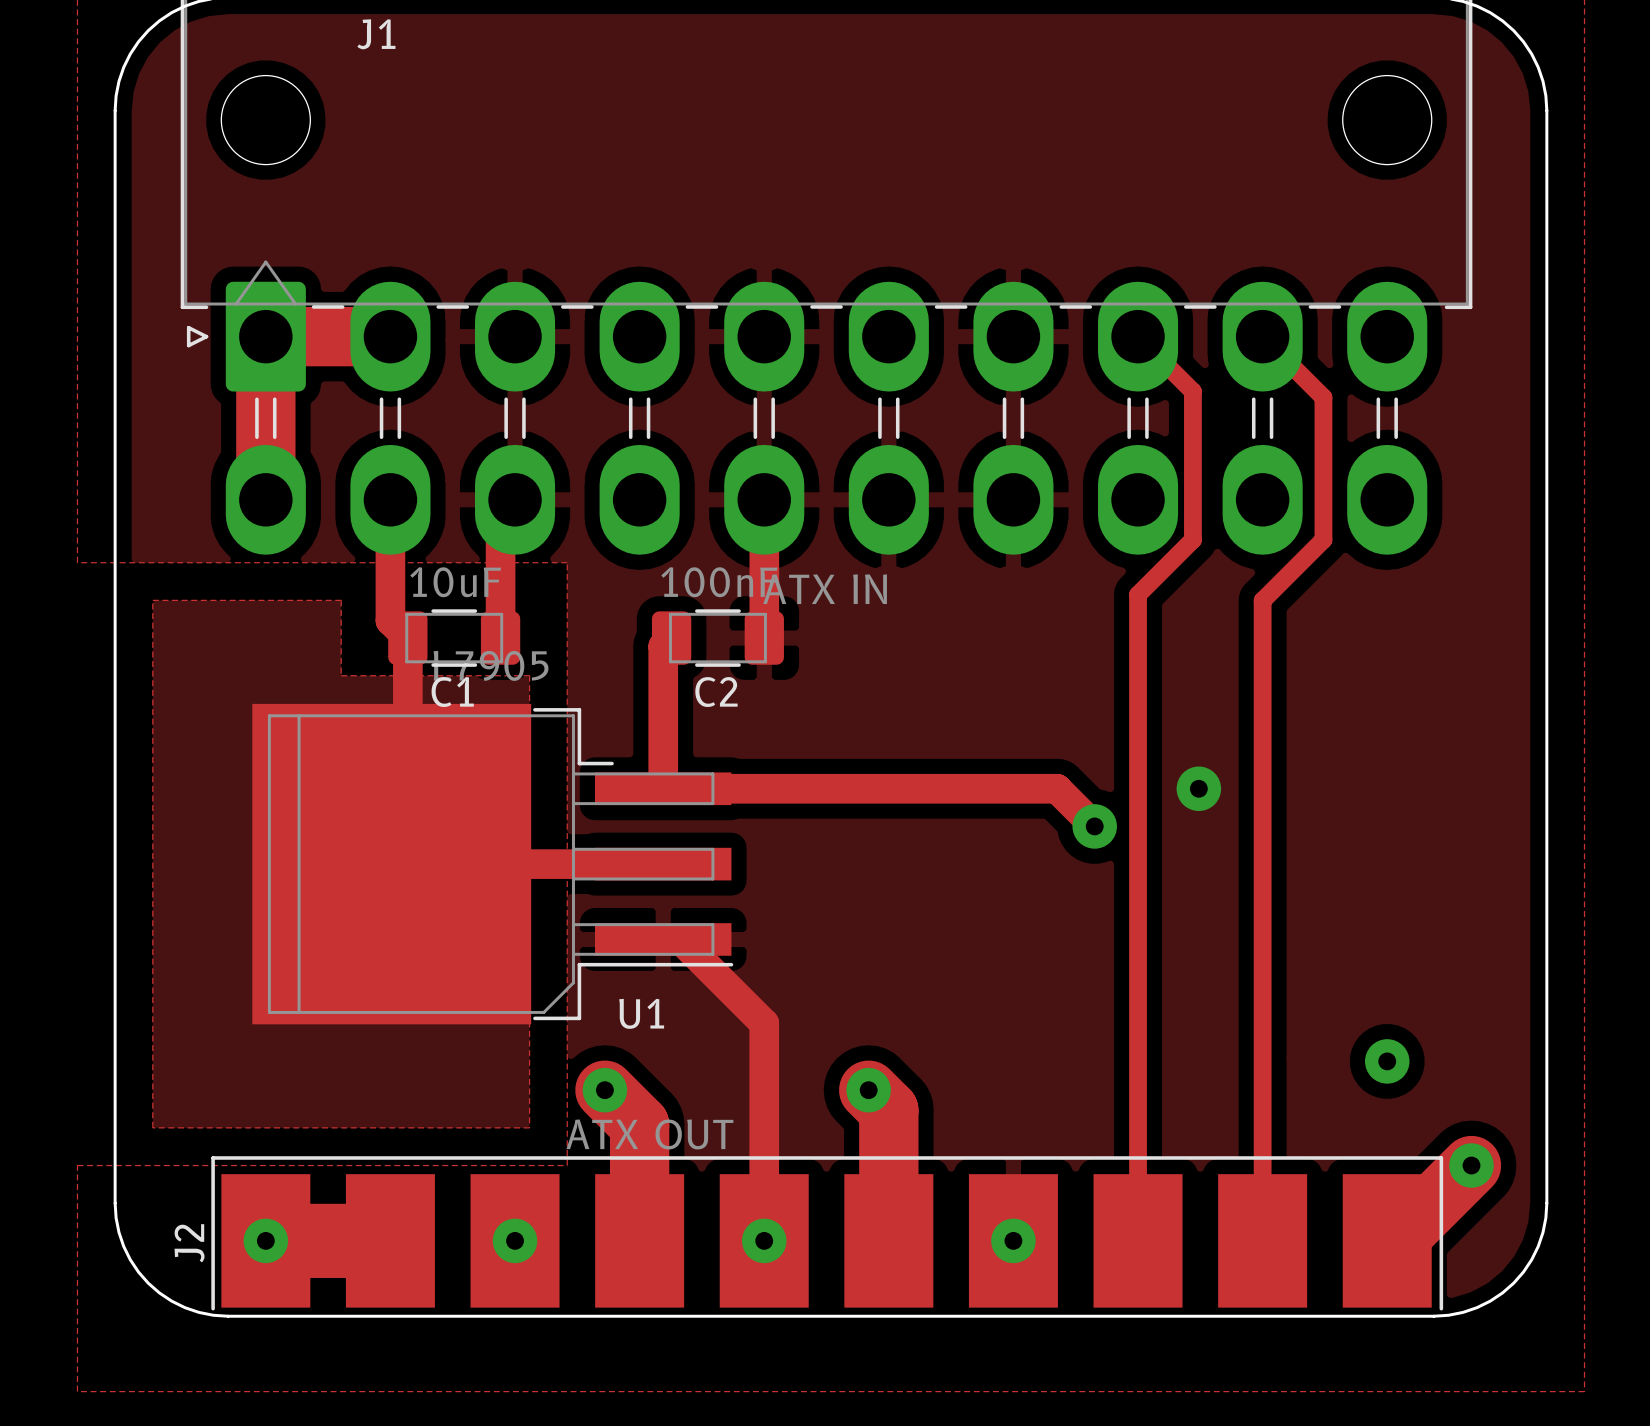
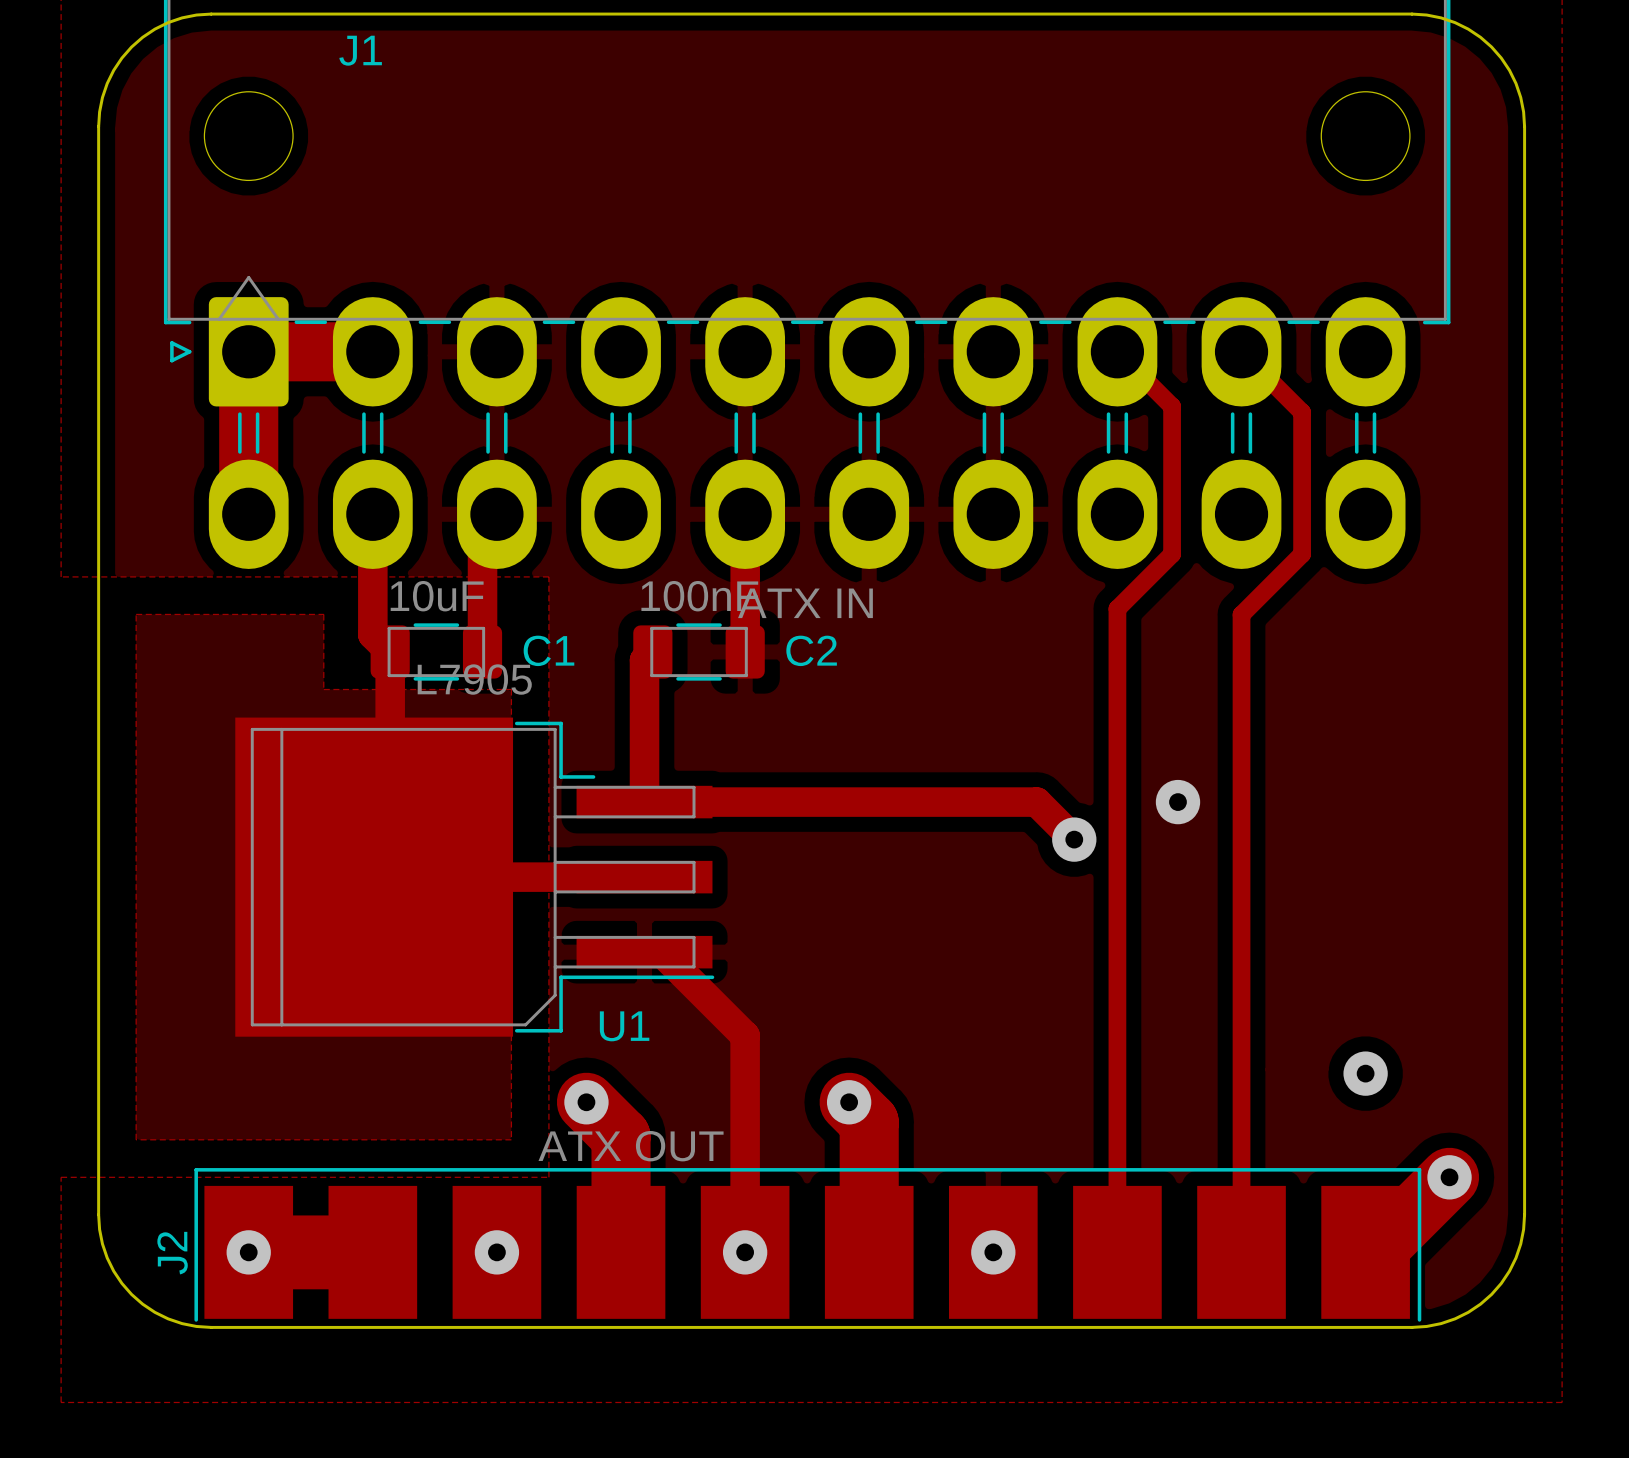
C1 name position: C1 (452, 692) -> C1 (548, 650)
C2 name position: C2 (716, 692) -> C2 (811, 650)

